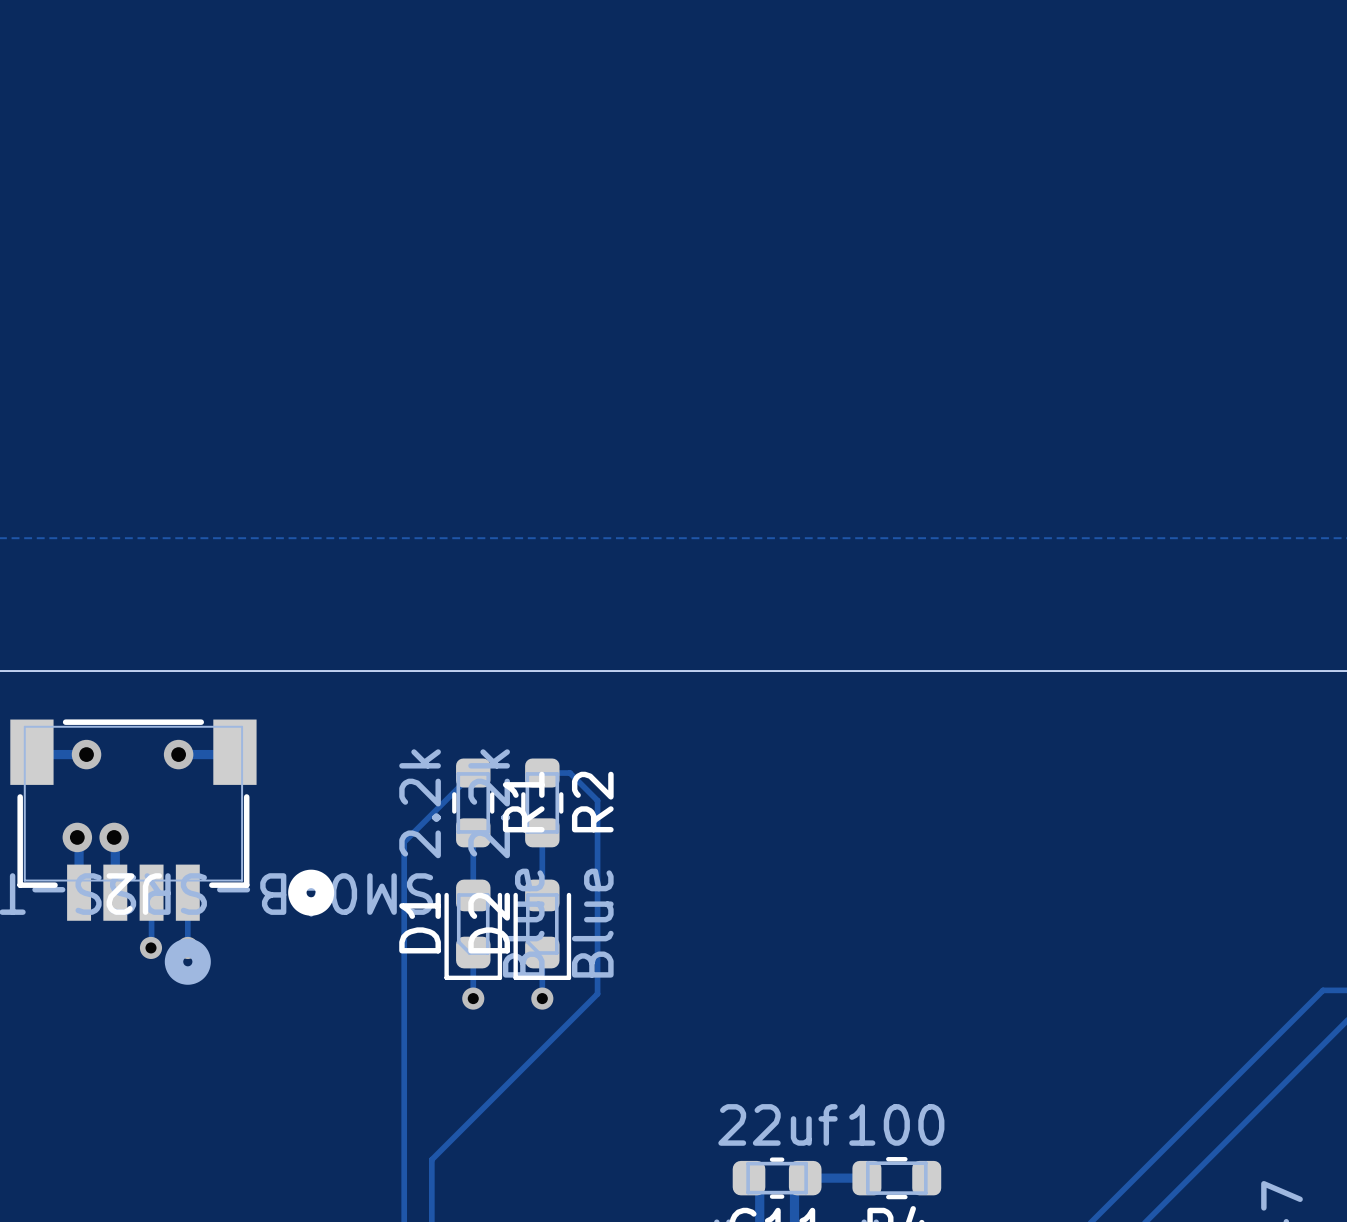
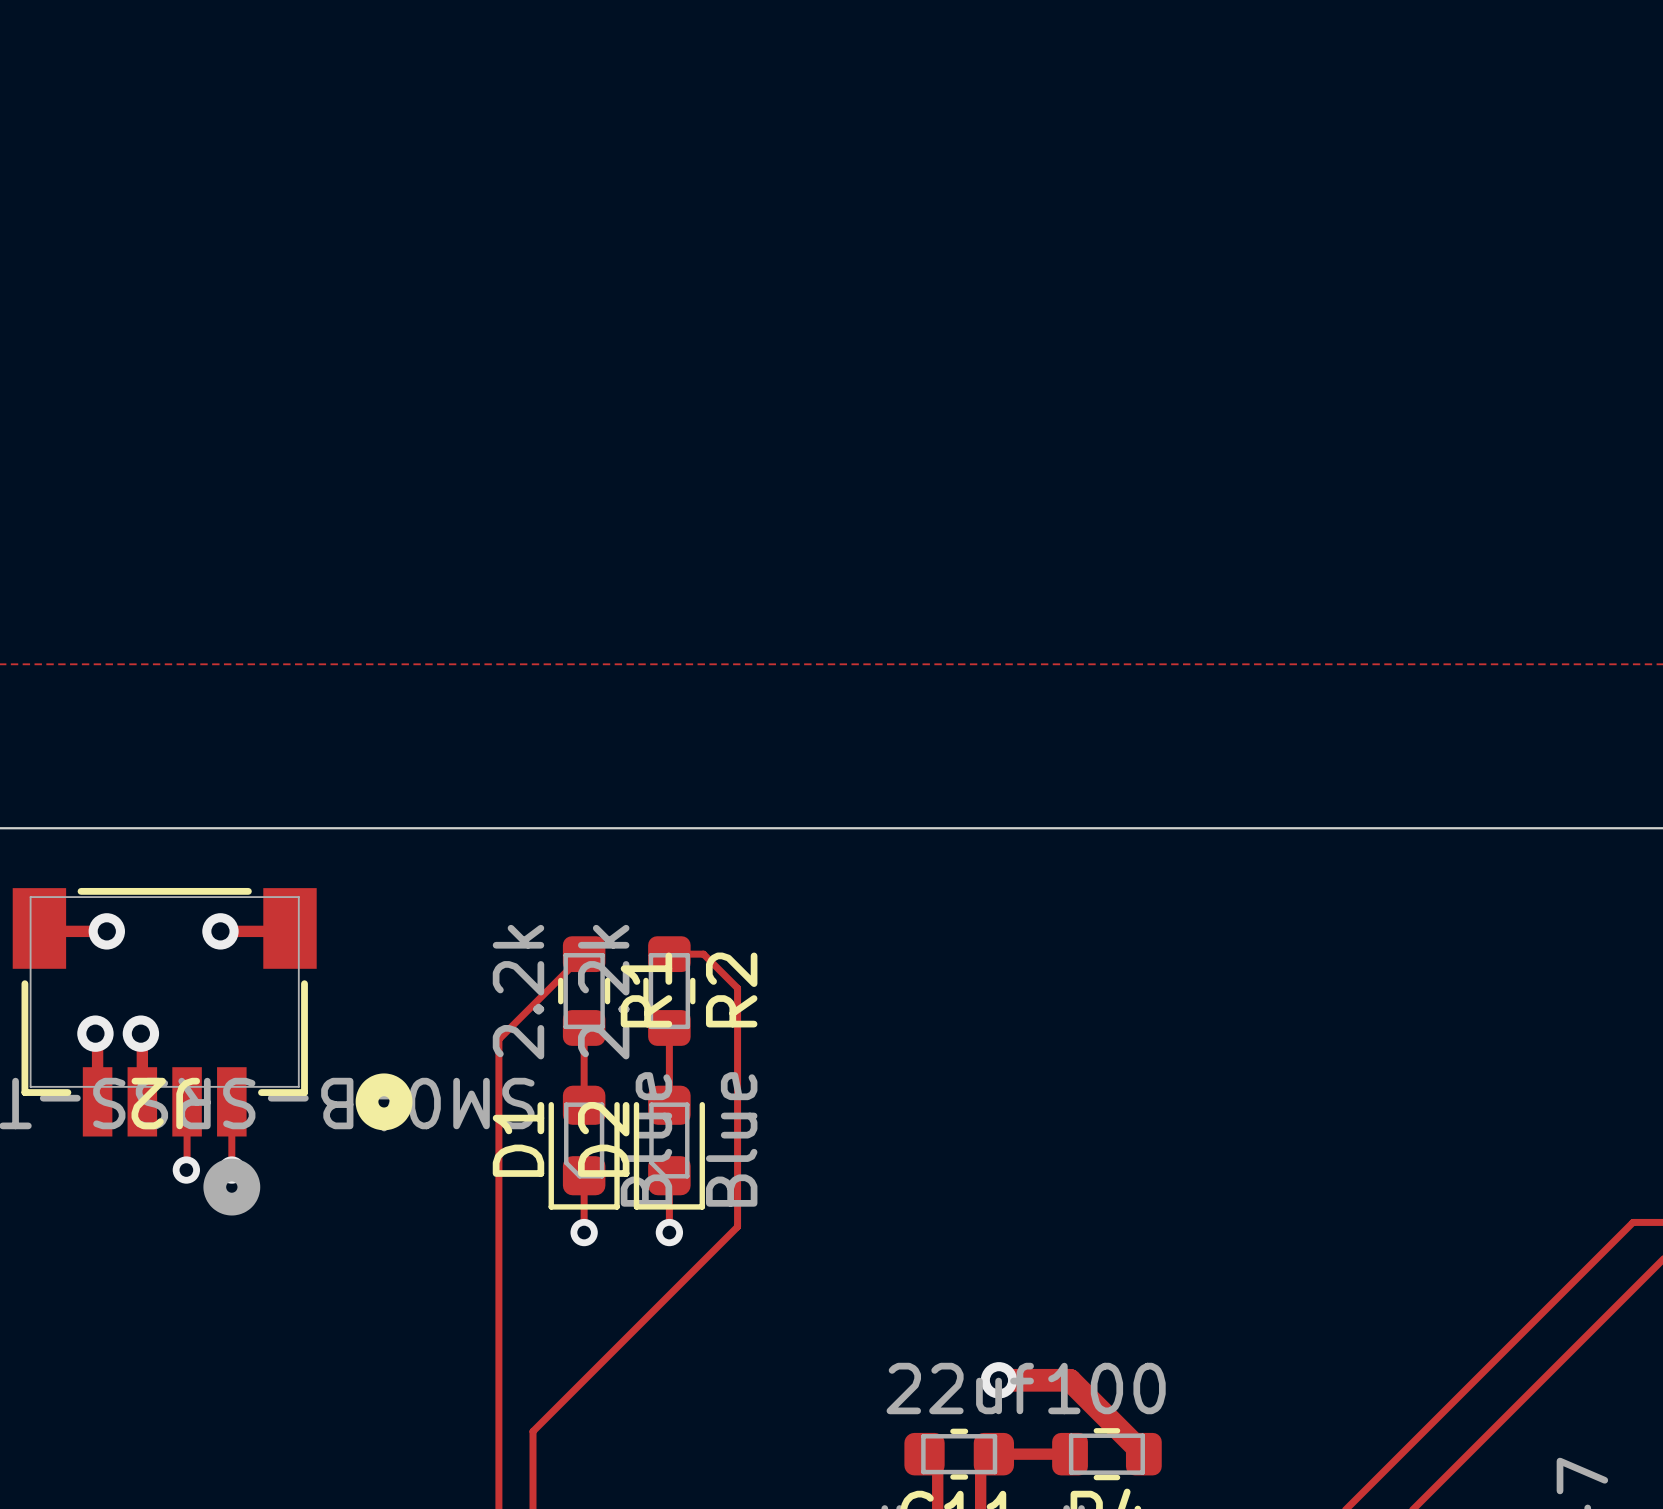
track: none -> (998, 1380) (1069, 1380) (1143, 1454)
via: none -> (998, 1380)

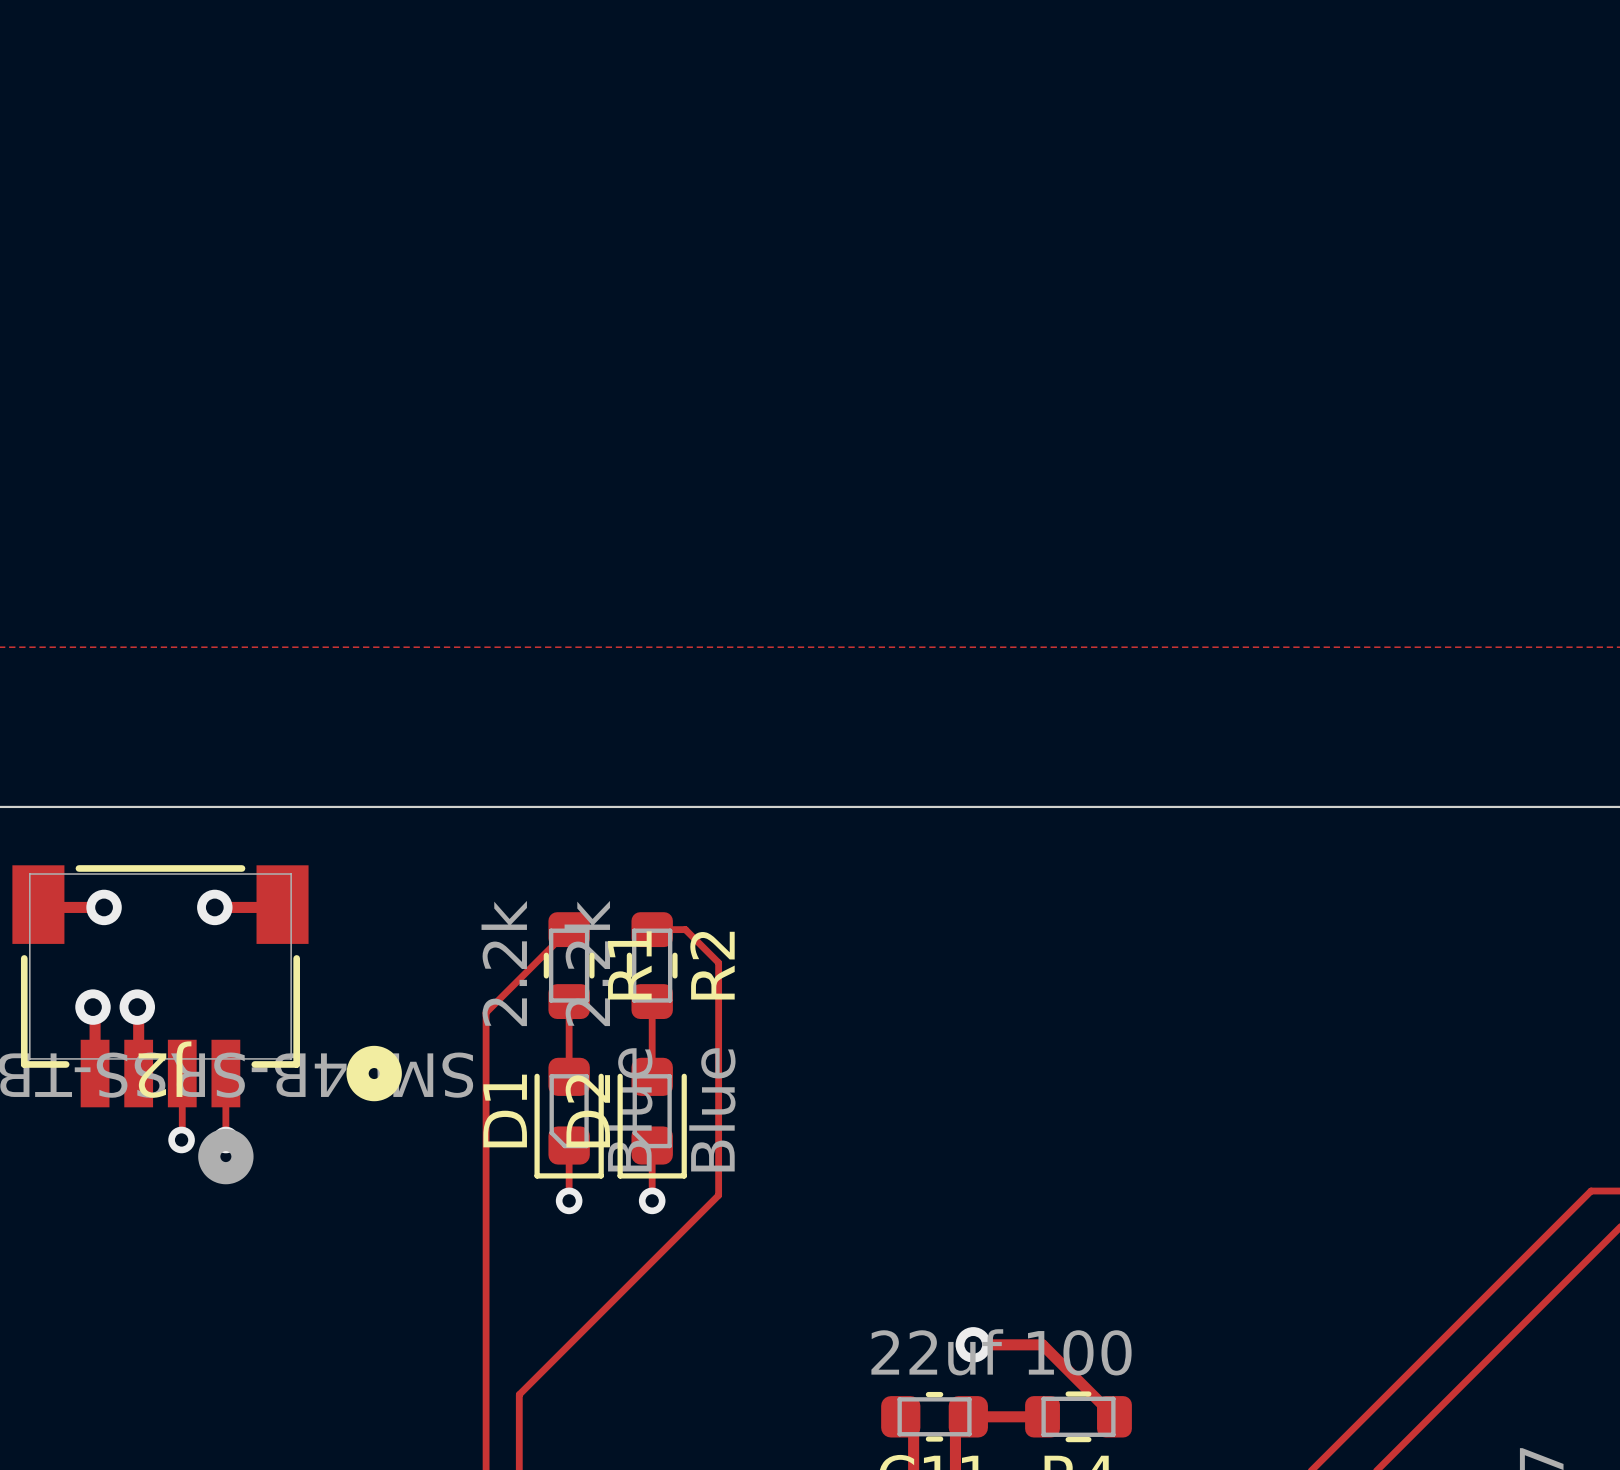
track width: thick (998, 1380) (1069, 1380) (1143, 1454) -> thin (973, 1344) (1042, 1344) (1114, 1416)

